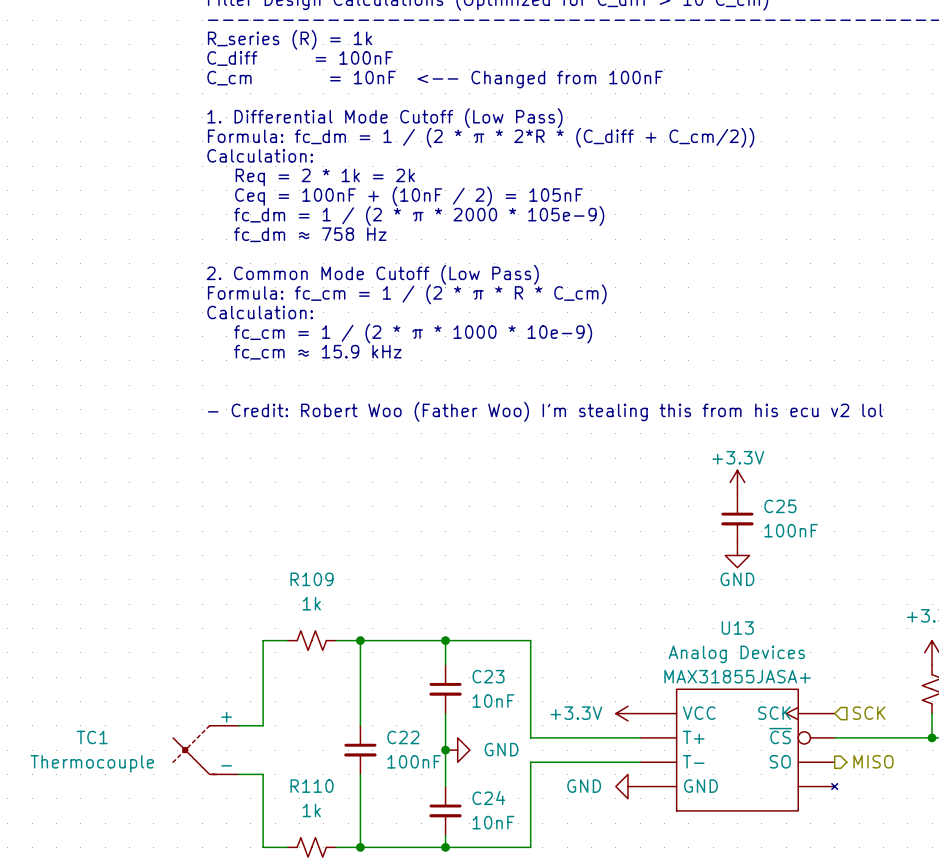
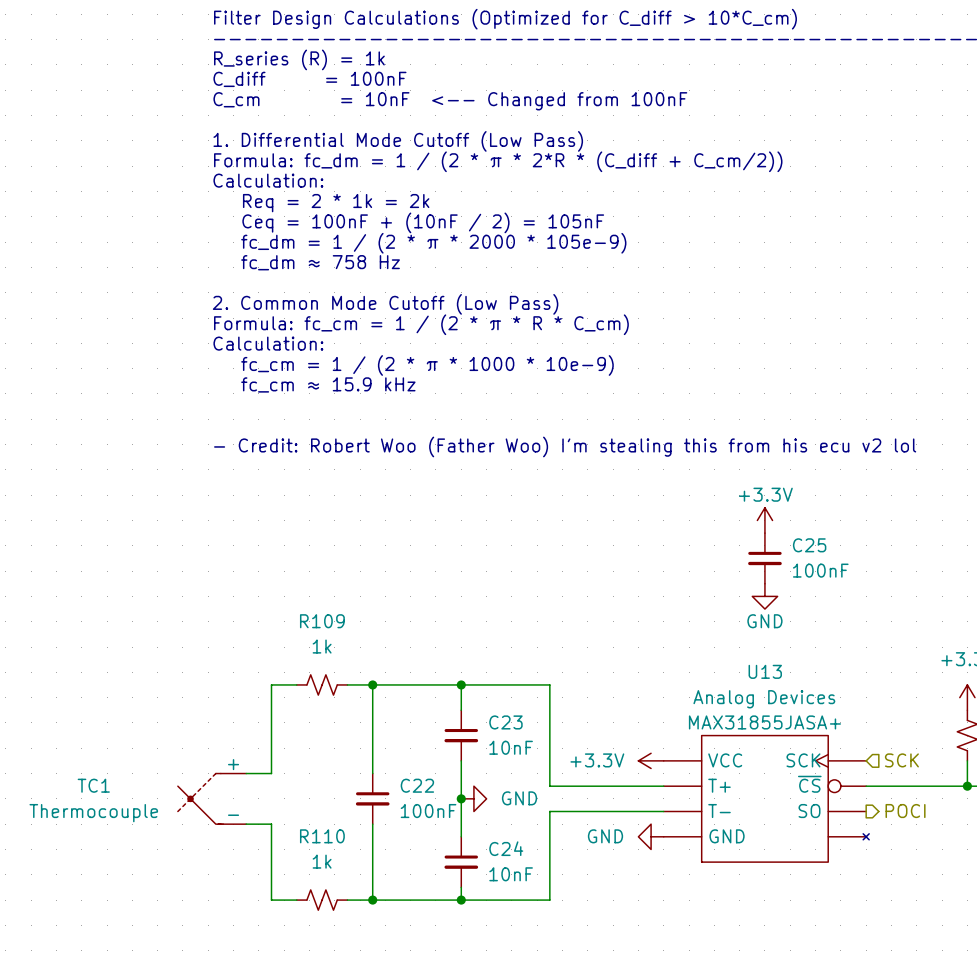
hierarchical label: MISO (873, 761) -> POCI (905, 811)

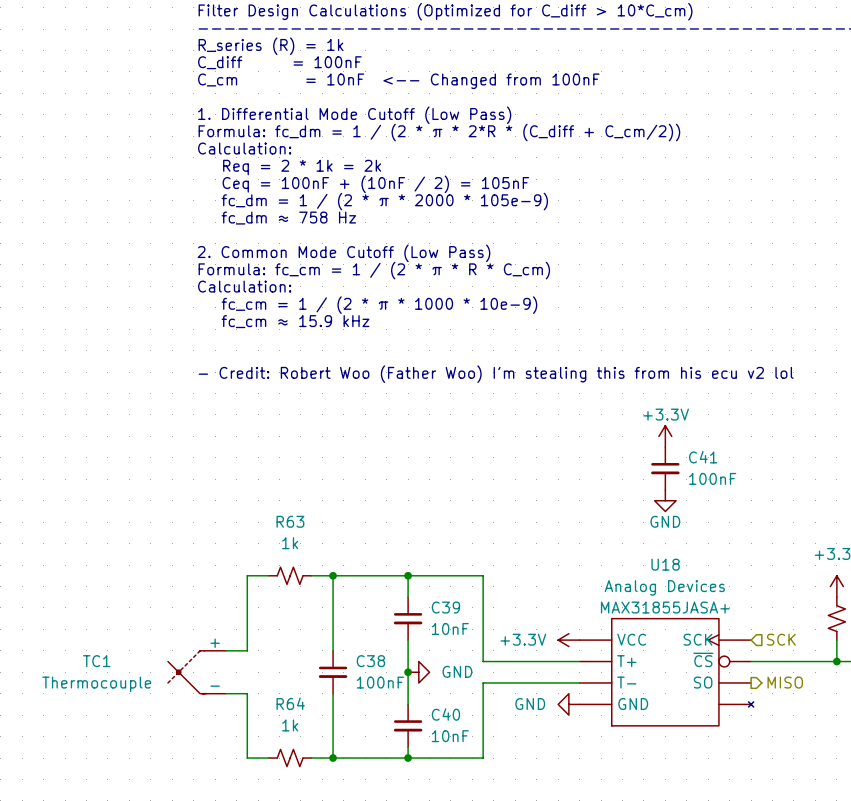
C25 name: C25 (809, 545) -> C41 (703, 457)
R109 name: R109 (322, 621) -> R63 (290, 521)
U13 name: U13 (765, 671) -> U18 (665, 564)
C23 name: C23 (505, 722) -> C39 (445, 607)
C22 name: C22 (417, 785) -> C38 (370, 661)
hierarchical label: POCI (905, 811) -> MISO (785, 682)
R110 name: R110 (322, 836) -> R64 (290, 703)
C24 name: C24 (506, 848) -> C40 (445, 714)

